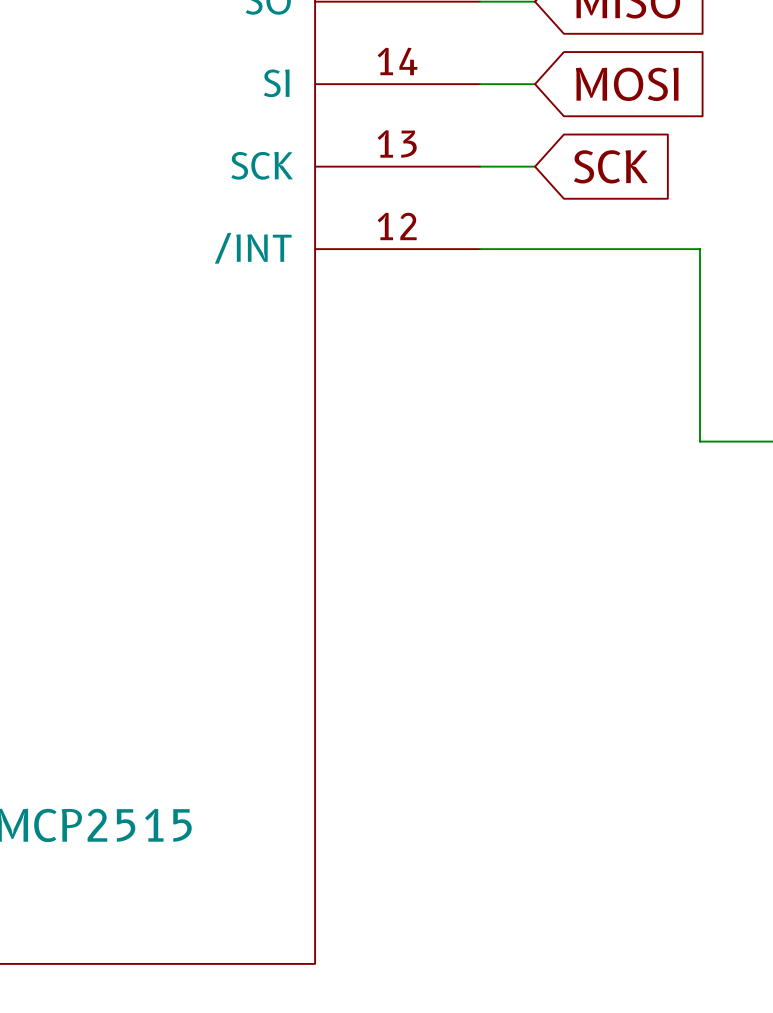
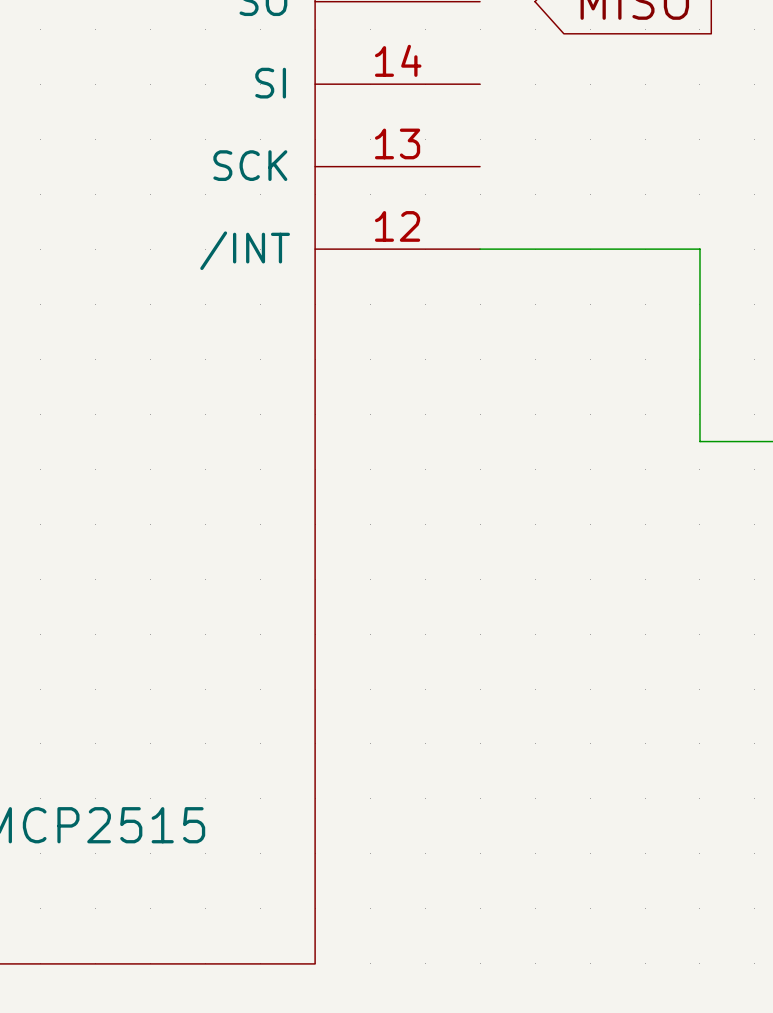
wire: (480, 1) (535, 1) -> none
wire: (480, 84) (535, 84) -> none
global label: MOSI (627, 84) -> none
wire: (480, 166) (535, 166) -> none
global label: SCK (610, 166) -> none

